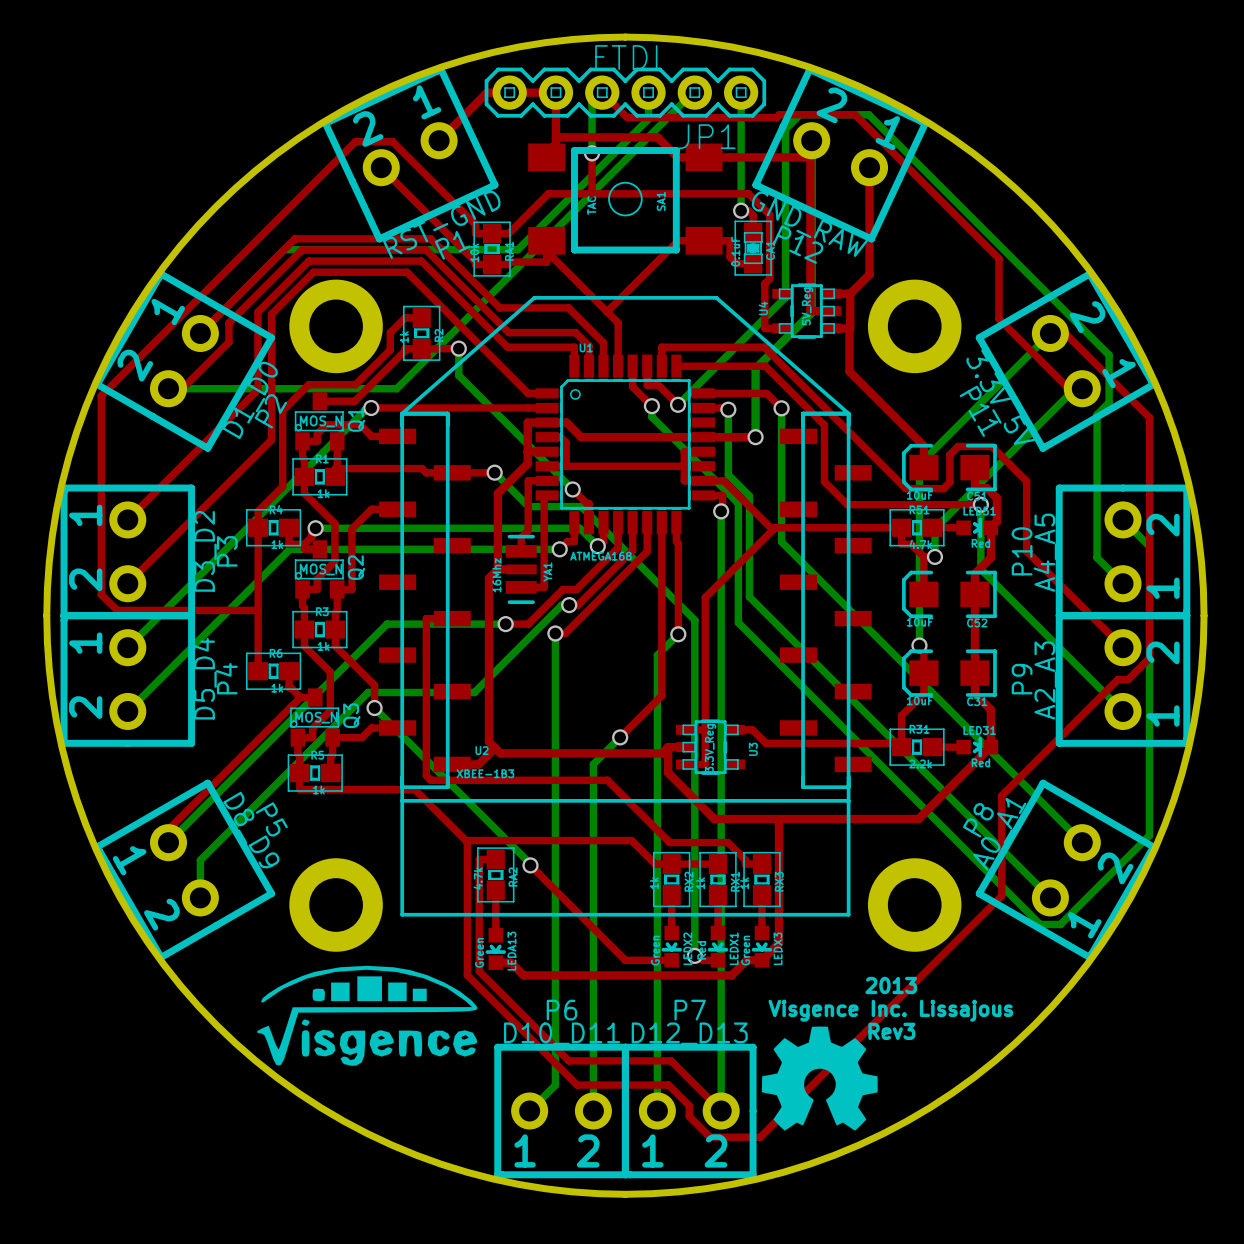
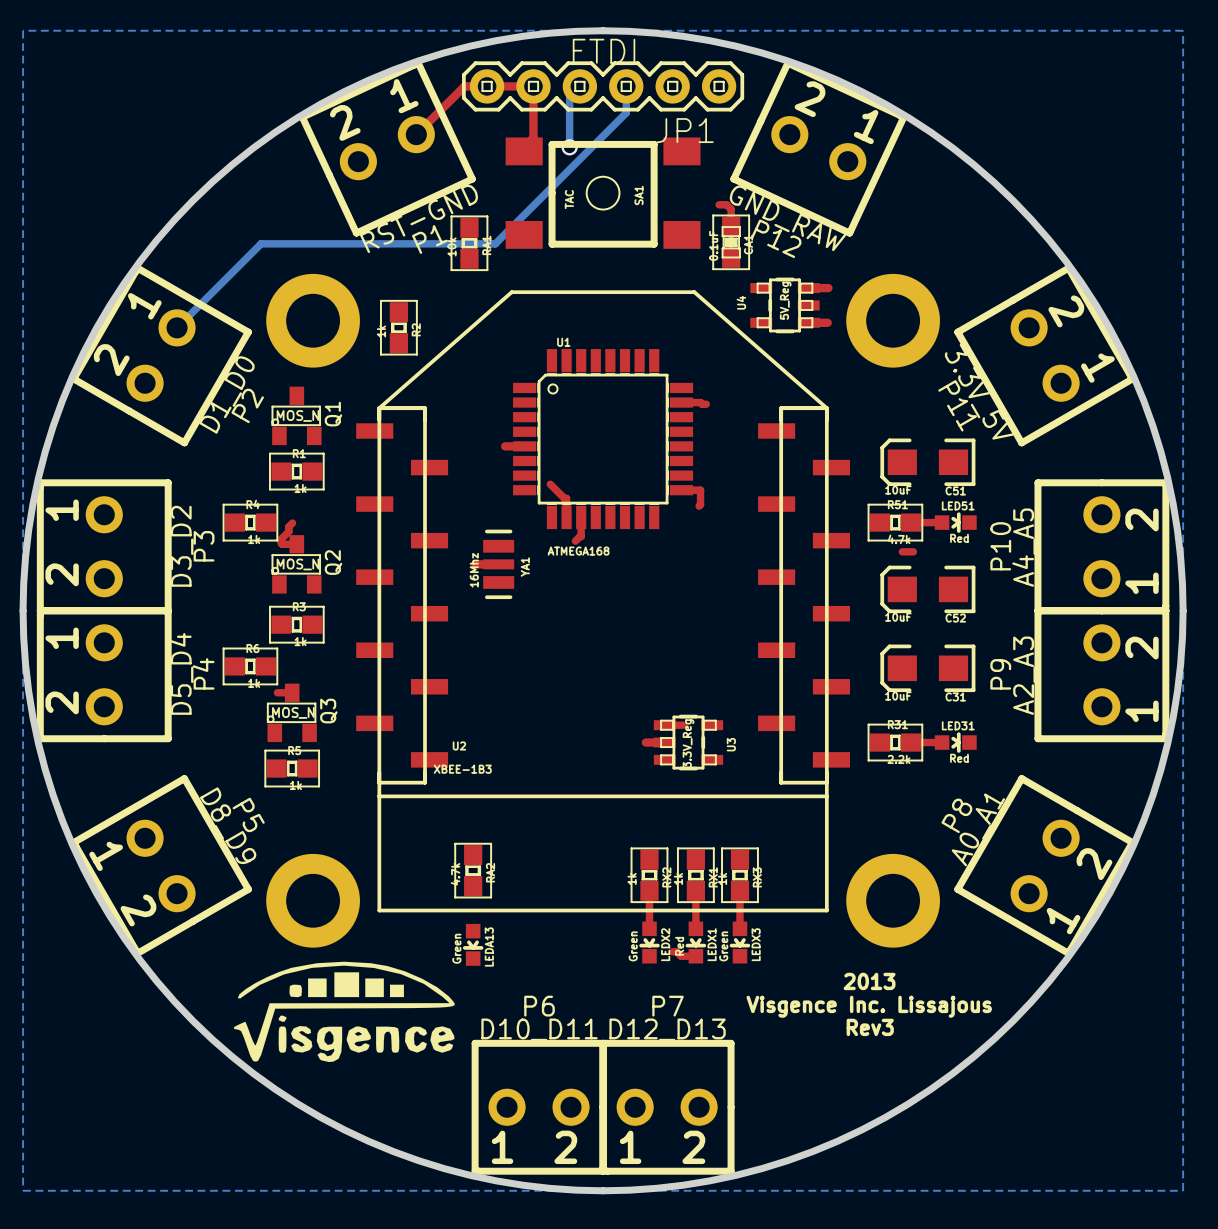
bottom zone outline: none -> (23, 30) (1183, 30) (1183, 1190) (23, 1190) (23, 30)
top track: (602, 92) (627, 117) (776, 117) (779, 114) (855, 114) (998, 258) (998, 318) (1068, 388) (1082, 388) -> none
bottom track: (694, 92) (396, 388) (168, 388) -> none
bottom track: (741, 92) (741, 210) -> none
top track: (555, 137) (657, 137) (677, 157) (810, 157) -> none
top track: (811, 140) (810, 309) (830, 311) -> none
bottom track: (811, 140) (811, 312) (755, 368) (755, 437) -> none
top track: (592, 153) (592, 193) -> none
top track: (381, 167) (475, 261) (475, 264) (546, 262) (546, 240) -> none
top track: (869, 167) (869, 274) (850, 293) (849, 371) (923, 446) (923, 467) -> none
via: (741, 210) -> none
top track: (546, 251) (618, 322) (618, 366) -> none
top track: (753, 263) (736, 263) (730, 256) (730, 240) (678, 240) (607, 311) -> none
top track: (421, 317) (405, 317) (390, 332) (390, 349) (355, 384) (308, 384) (282, 410) (282, 486) (258, 511) (258, 671) -> none
top track: (783, 328) (764, 328) (764, 283) (769, 278) (769, 214) (748, 193) (548, 193) (508, 233) (475, 233) (475, 224) (392, 141) (355, 141) (101, 395) (101, 594) (117, 610) (258, 610) -> none
top track: (200, 333) (295, 238) (430, 238) (499, 307) (568, 307) (603, 342) (603, 366) -> none
top track: (1050, 333) (1065, 333) (1149, 417) (1149, 658) (1128, 679) (1117, 679) (1001, 795) (1001, 895) (760, 1137) (710, 1137) (689, 1116) (689, 1105) (668, 1085) (577, 1085) (467, 975) (467, 842) -> none
bottom track: (1050, 333) (919, 464) (919, 645) -> none
top track: (458, 348) (405, 348) (354, 401) (319, 401) -> none
bottom track: (458, 348) (458, 375) (572, 489) -> none
via: (458, 348) -> none
top track: (574, 366) (574, 347) (507, 347) (421, 261) (308, 261) (257, 312) (257, 389) (127, 519) -> none
top track: (588, 366) (588, 345) (575, 332) (508, 332) (426, 249) (301, 249) (228, 323) (228, 342) (182, 388) (168, 388) -> none
top track: (632, 366) (632, 386) (651, 406) -> none
top track: (647, 366) (647, 385) (658, 385) (678, 404) -> none
top track: (661, 366) (661, 347) (764, 347) (905, 488) (943, 488) (949, 482) (949, 454) (958, 446) (991, 446) (1026, 481) (1026, 551) (1123, 647) -> none
top track: (676, 366) (765, 366) (824, 425) (824, 481) (847, 504) (980, 504) -> none
bottom track: (1082, 388) (1074, 388) (934, 528) (934, 556) -> none
top track: (547, 393) (528, 393) (406, 272) (313, 272) (271, 314) (271, 439) (127, 583) -> none
top track: (703, 393) (766, 393) (781, 408) -> none
bottom track: (678, 404) (785, 297) (785, 129) (799, 114) (868, 114) (1109, 355) (1109, 402) (1097, 414) (1097, 557) (1123, 583) -> none
via: (678, 404) -> none
bottom track: (651, 406) (651, 416) (738, 503) (738, 622) (1040, 924) (1060, 924) (1149, 835) (1149, 546) (1123, 519) -> none
via: (651, 406) -> none
top track: (371, 407) (547, 407) -> none
bottom track: (371, 407) (367, 407) (127, 647) -> none
via: (371, 407) -> none
bottom track: (781, 408) (781, 541) (1082, 842) -> none
via: (781, 408) -> none
bottom track: (728, 409) (728, 474) (749, 495) (749, 596) (1050, 897) -> none
via: (728, 409) -> none
top track: (397, 436) (371, 436) (360, 424) (326, 424) (317, 433) (317, 441) (302, 441) (304, 493) (334, 523) (334, 561) (317, 579) (317, 589) (302, 589) (304, 646) (330, 671) (330, 710) (312, 728) (312, 737) (297, 737) (299, 789) (414, 789) (467, 842) -> none
top track: (547, 437) (560, 437) (566, 442) (566, 466) -> none
top track: (755, 437) (581, 437) (566, 422) (527, 422) (527, 463) (497, 493) (497, 569) (488, 578) (488, 741) (500, 753) (661, 753) (668, 747) (668, 772) (714, 819) (918, 819) (990, 746) -> none
via: (755, 437) -> none
top track: (337, 441) (337, 468) -> none
top track: (703, 451) (684, 452) (684, 480) (723, 480) (772, 529) -> none
top track: (547, 466) (684, 466) -> none
top track: (974, 467) (974, 488) (986, 488) (996, 498) (996, 521) (990, 527) (990, 557) (974, 573) (974, 693) (990, 709) (990, 747) -> none
top track: (494, 472) (426, 472) (422, 468) (335, 468) (335, 476) -> none
bottom track: (494, 472) (528, 506) (581, 506) (694, 620) (694, 955) -> none
via: (494, 472) -> none
top track: (547, 480) (528, 480) (528, 530) (521, 537) (521, 551) -> none
via: (572, 489) -> none
top track: (547, 495) (544, 498) (544, 587) (521, 587) -> none
bottom track: (980, 504) (980, 569) (1123, 711) -> none
via: (980, 504) -> none
top track: (397, 509) (371, 509) (351, 529) (351, 589) (337, 589) (335, 646) (374, 685) (374, 708) -> none
bottom track: (721, 511) (721, 1110) -> none
via: (721, 511) -> none
top track: (574, 522) (574, 541) (567, 541) (559, 549) -> none
top track: (618, 522) (618, 547) (576, 589) (562, 589) (528, 624) (505, 624) -> none
top track: (632, 522) (632, 550) (577, 605) (569, 605) -> none
top track: (647, 522) (647, 551) (565, 633) (555, 633) -> none
top track: (661, 522) (661, 695) (620, 737) -> none
top track: (676, 522) (676, 541) (678, 543) (678, 634) -> none
top track: (289, 527) (289, 544) (304, 544) -> none
bottom track: (315, 528) (579, 528) (597, 546) -> none
via: (315, 528) -> none
via: (597, 546) -> none
bottom track: (559, 549) (289, 549) (127, 711) -> none
via: (559, 549) -> none
via: (934, 556) -> none
top track: (923, 594) (923, 556) (911, 544) (901, 544) (901, 527) (775, 527) (705, 597) (705, 764) (686, 764) -> none
bottom track: (569, 605) (561, 605) (474, 692) (368, 692) (200, 860) (200, 897) -> none
via: (569, 605) -> none
top track: (452, 618) (426, 618) (426, 775) (431, 780) (607, 780) (669, 842) (728, 842) (745, 859) (745, 864) (761, 864) -> none
bottom track: (505, 624) (387, 624) (168, 842) -> none
via: (505, 624) -> none
bottom track: (555, 633) (555, 1085) (529, 1110) -> none
via: (555, 633) -> none
bottom track: (678, 634) (657, 655) (657, 1110) -> none
via: (678, 634) -> none
top track: (919, 645) (923, 649) (923, 693) (901, 715) (901, 747) -> none
via: (919, 645) -> none
top track: (289, 671) (289, 687) (300, 697) (168, 829) (168, 842) -> none
bottom track: (374, 708) (530, 865) -> none
via: (374, 708) -> none
top track: (397, 727) (371, 727) (362, 737) (332, 737) (330, 773) -> none
top track: (734, 729) (752, 729) (766, 743) (901, 743) -> none
bottom track: (620, 737) (593, 764) (593, 1110) -> none
via: (620, 737) -> none
top track: (495, 747) (478, 764) (452, 764) -> none
top track: (778, 819) (778, 943) (761, 960) (746, 960) (731, 975) (523, 975) (510, 962) (495, 962) -> none
top track: (467, 842) (631, 840) (655, 864) (717, 864) -> none
top track: (495, 859) (479, 859) (479, 971) (568, 1060) (671, 1060) (721, 1110) -> none
top track: (530, 865) (625, 960) (671, 960) -> none
via: (530, 865) -> none
top track: (495, 890) (495, 935) -> none
via: (694, 955) -> none
drawing: [761, 1026, 878, 1131] -> none

